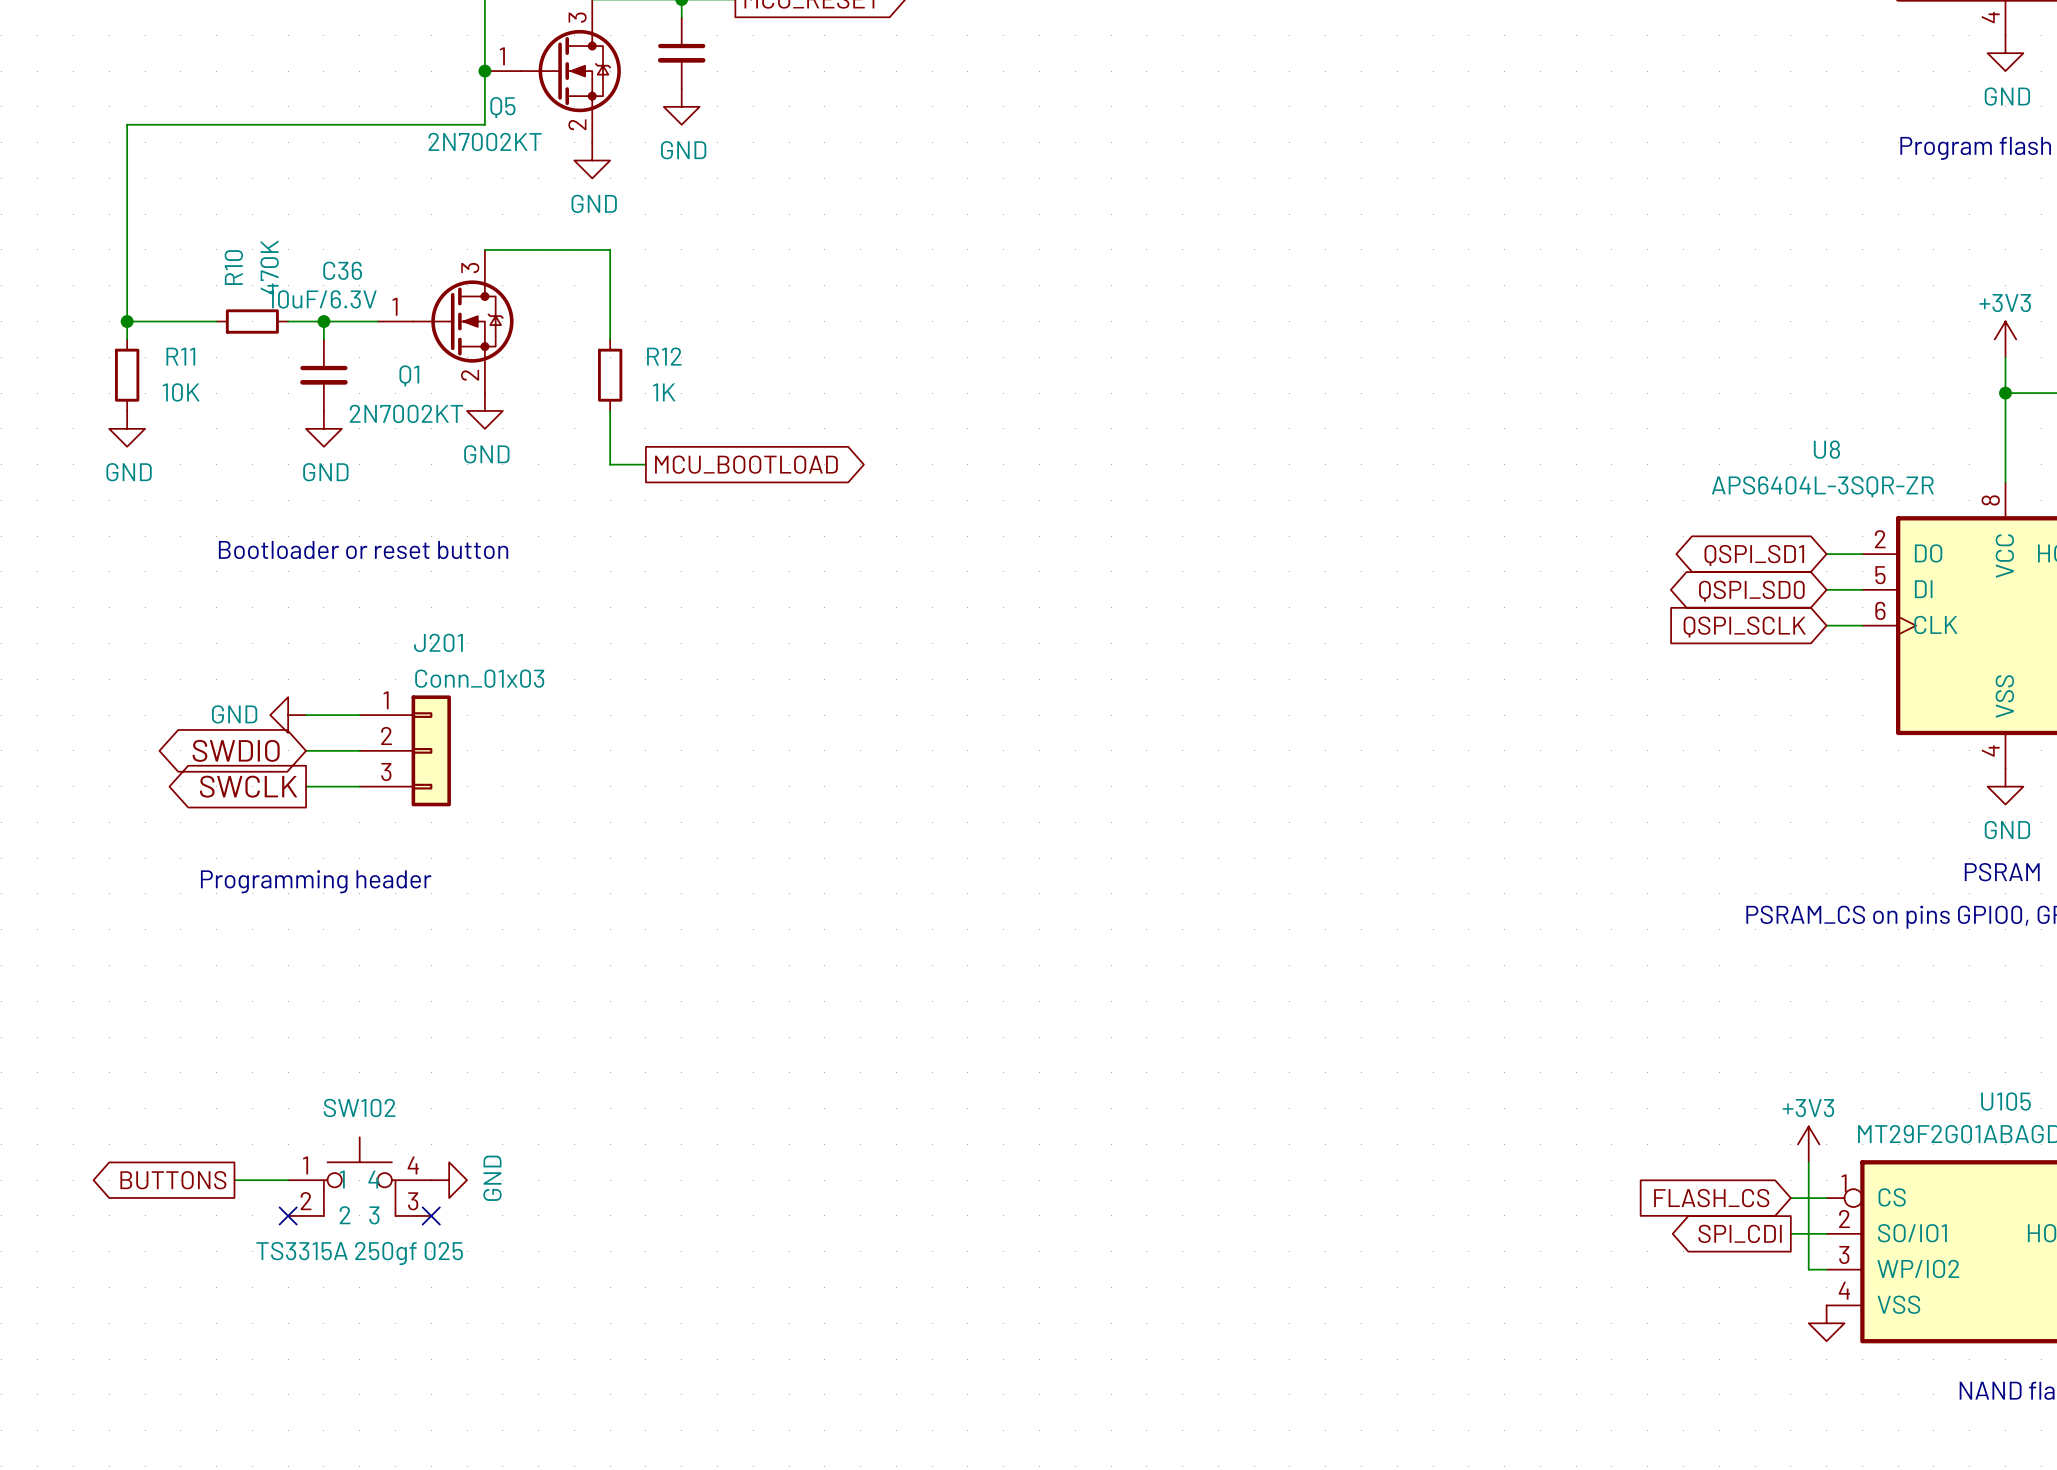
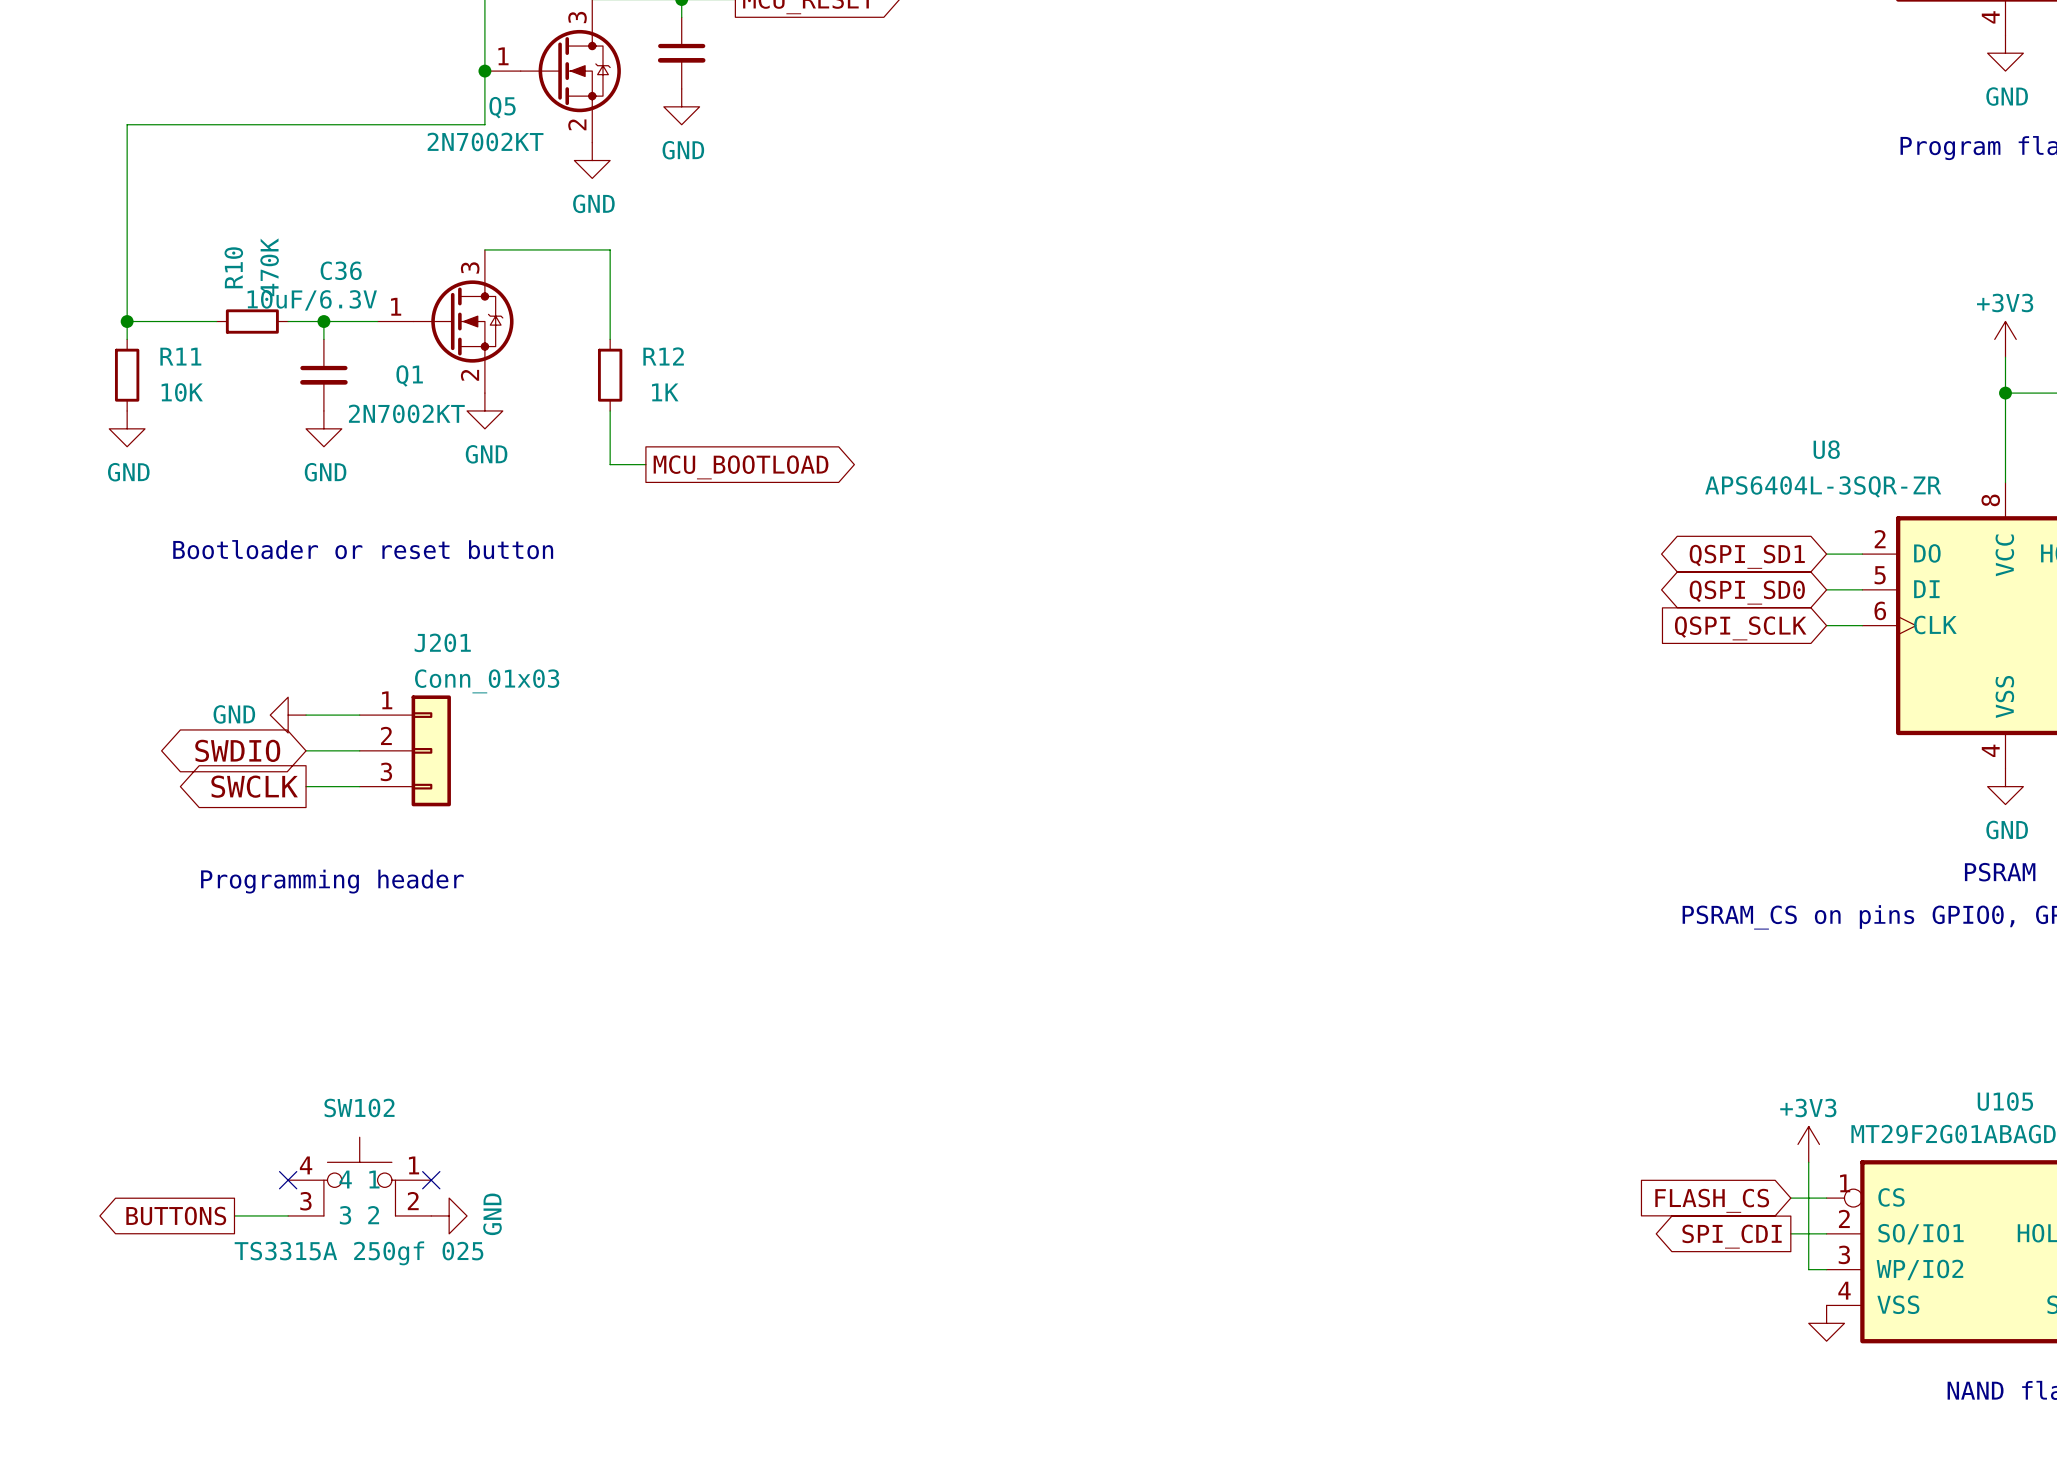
SW102 flip: as is (359, 1176) -> left-right (359, 1176)
global label position: BUTTONS (173, 1180) -> BUTTONS (176, 1215)
wire: (234, 1180) (288, 1180) -> (234, 1215) (288, 1215)
power symbol position: GND (449, 1180) -> GND (449, 1215)
no-connect mark position: (288, 1215) -> (288, 1180)
no-connect mark position: (431, 1215) -> (431, 1180)

